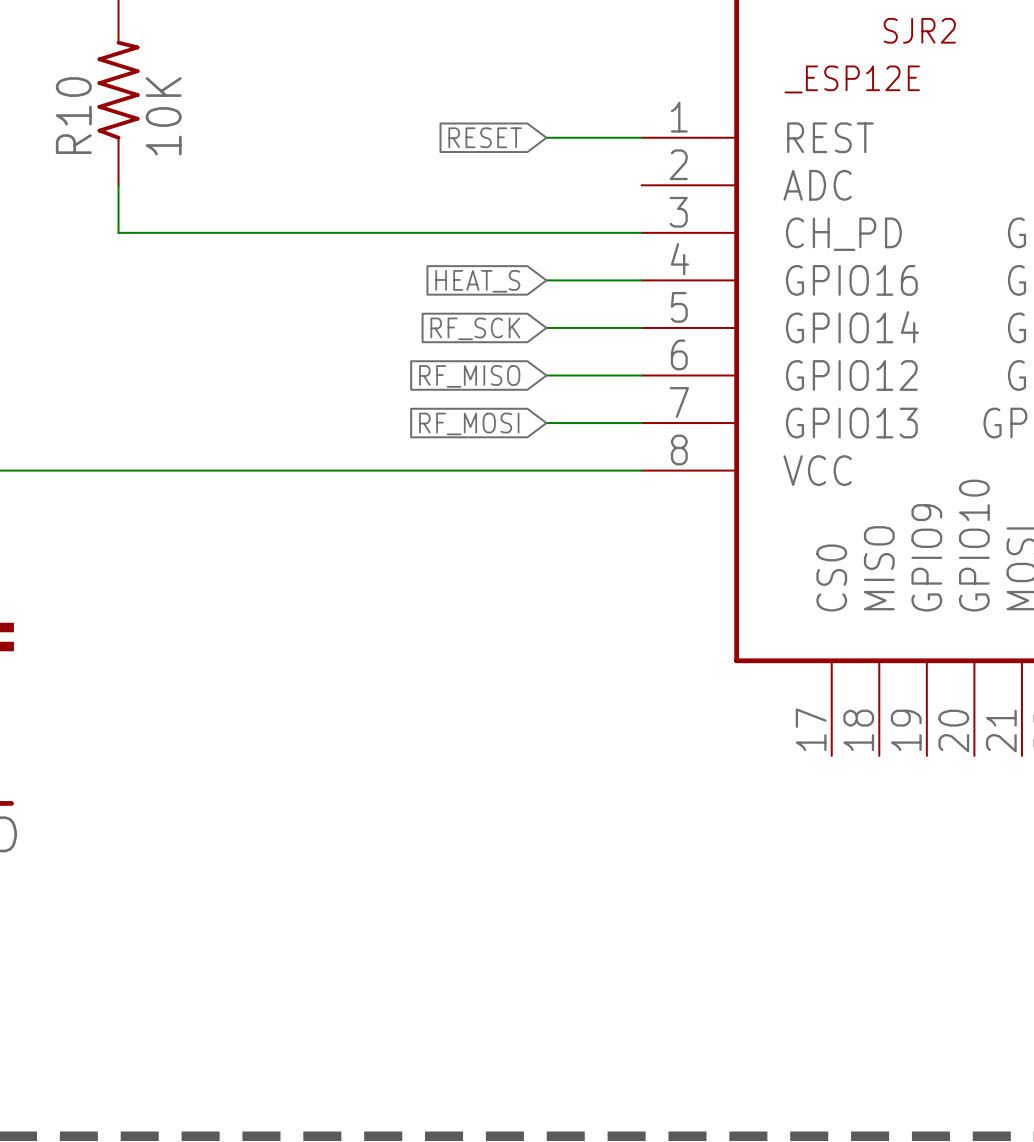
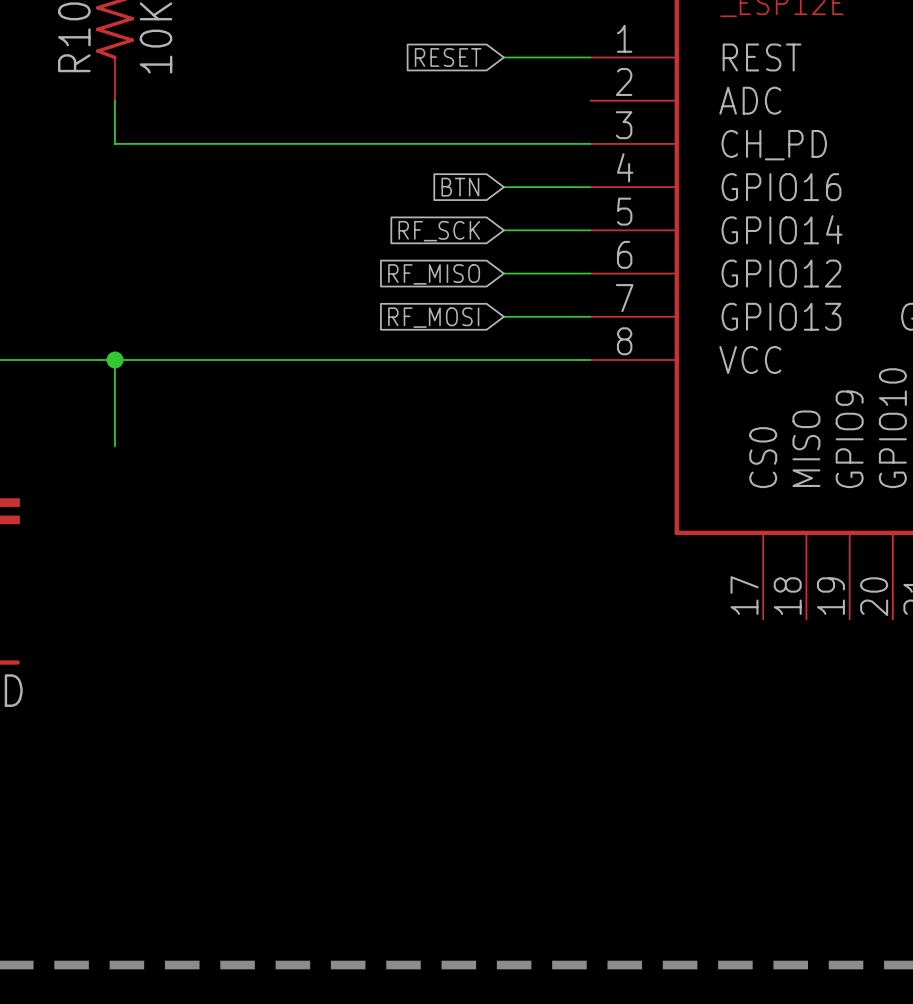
global label: HEAT_S (477, 281) -> BTN (460, 187)
wire: none -> (114, 360) (114, 446)
junction: none -> (114, 360)

